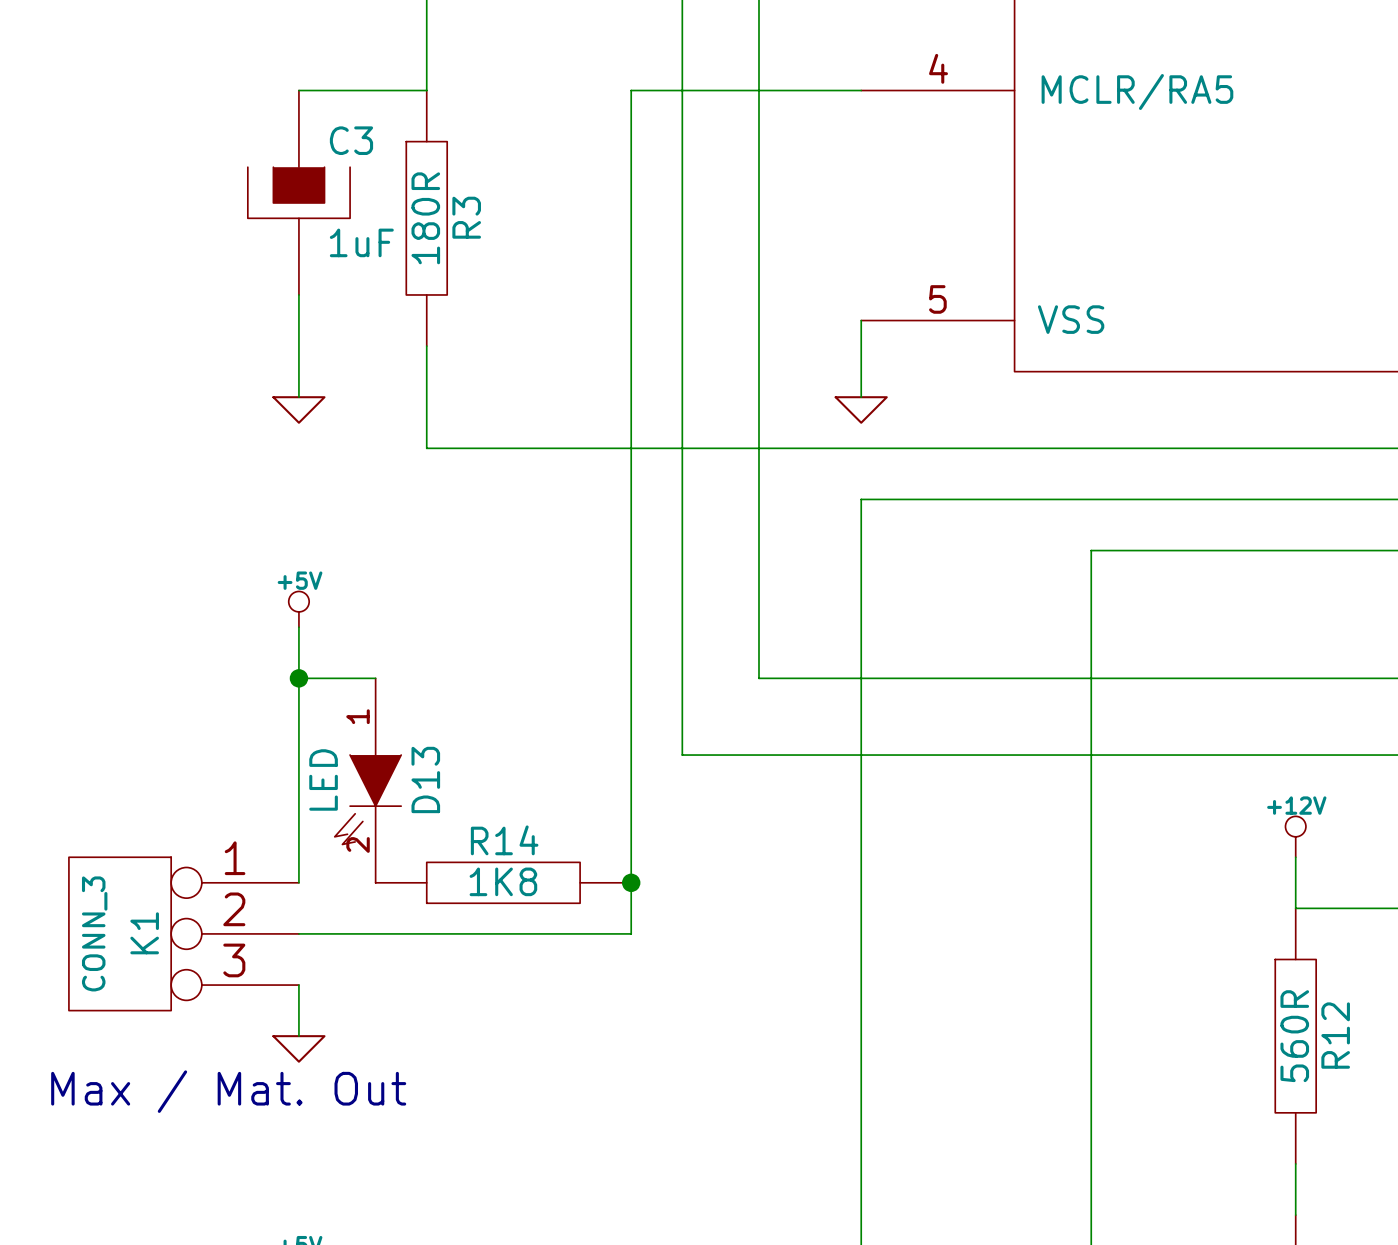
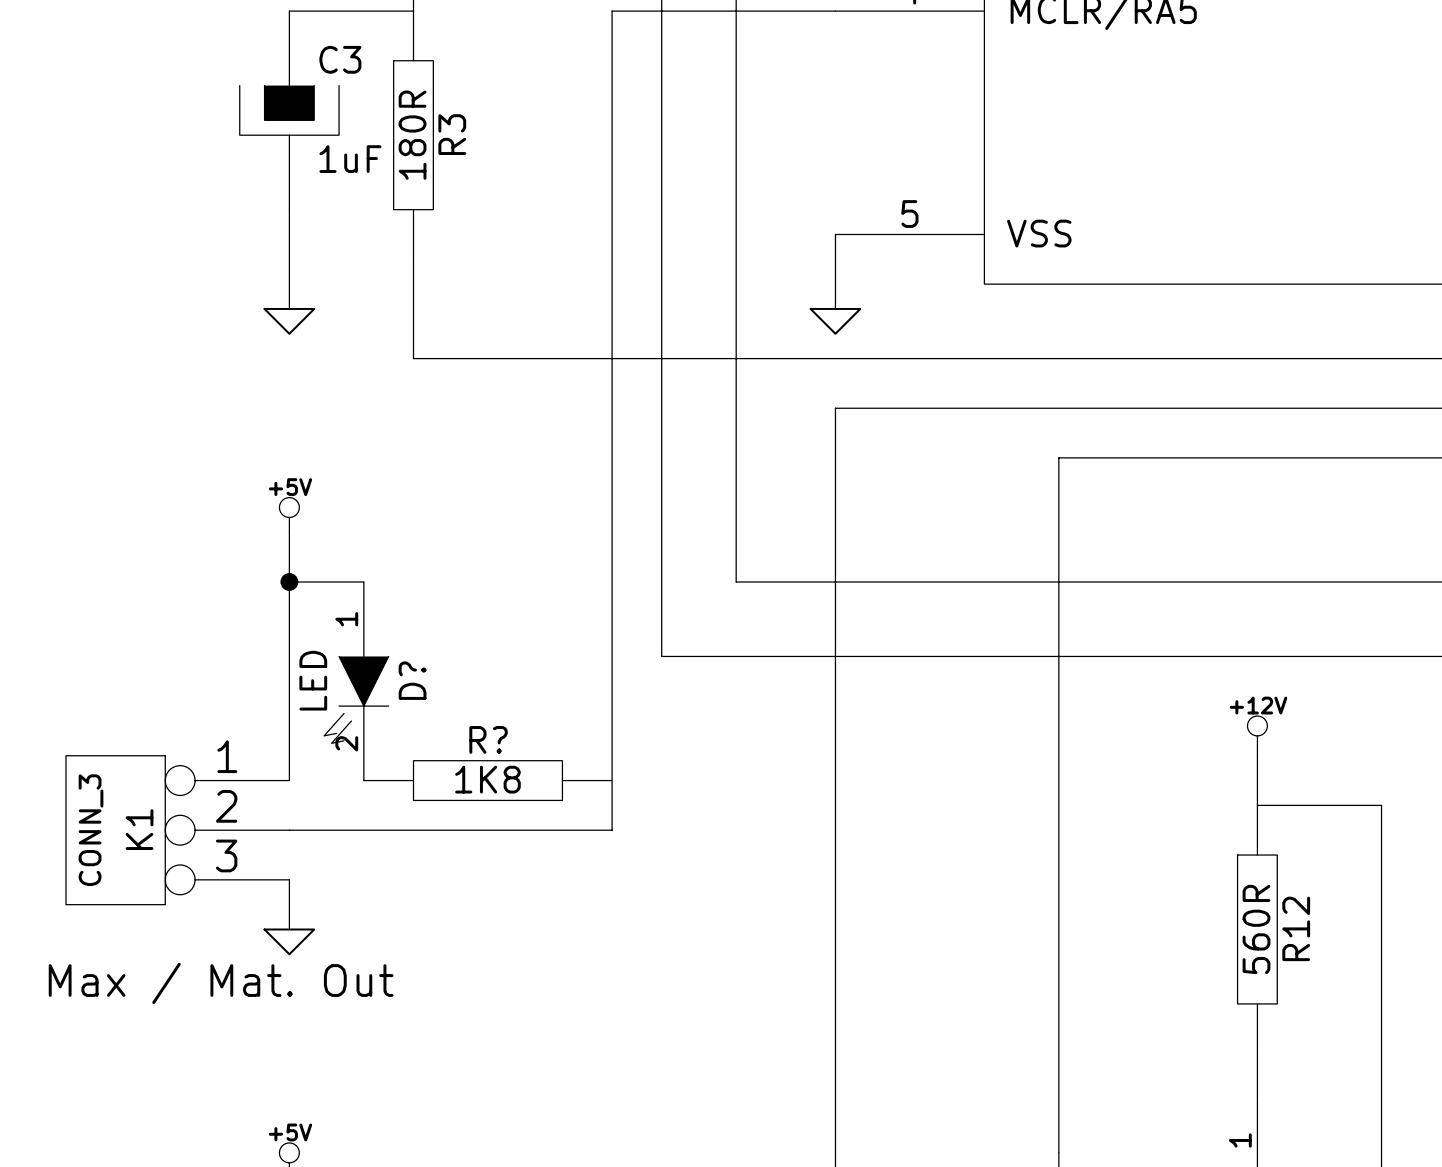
D13 name: D13 (425, 779) -> D? (412, 680)
R14 name: R14 (504, 840) -> R? (488, 739)
junction: (631, 882) -> none

